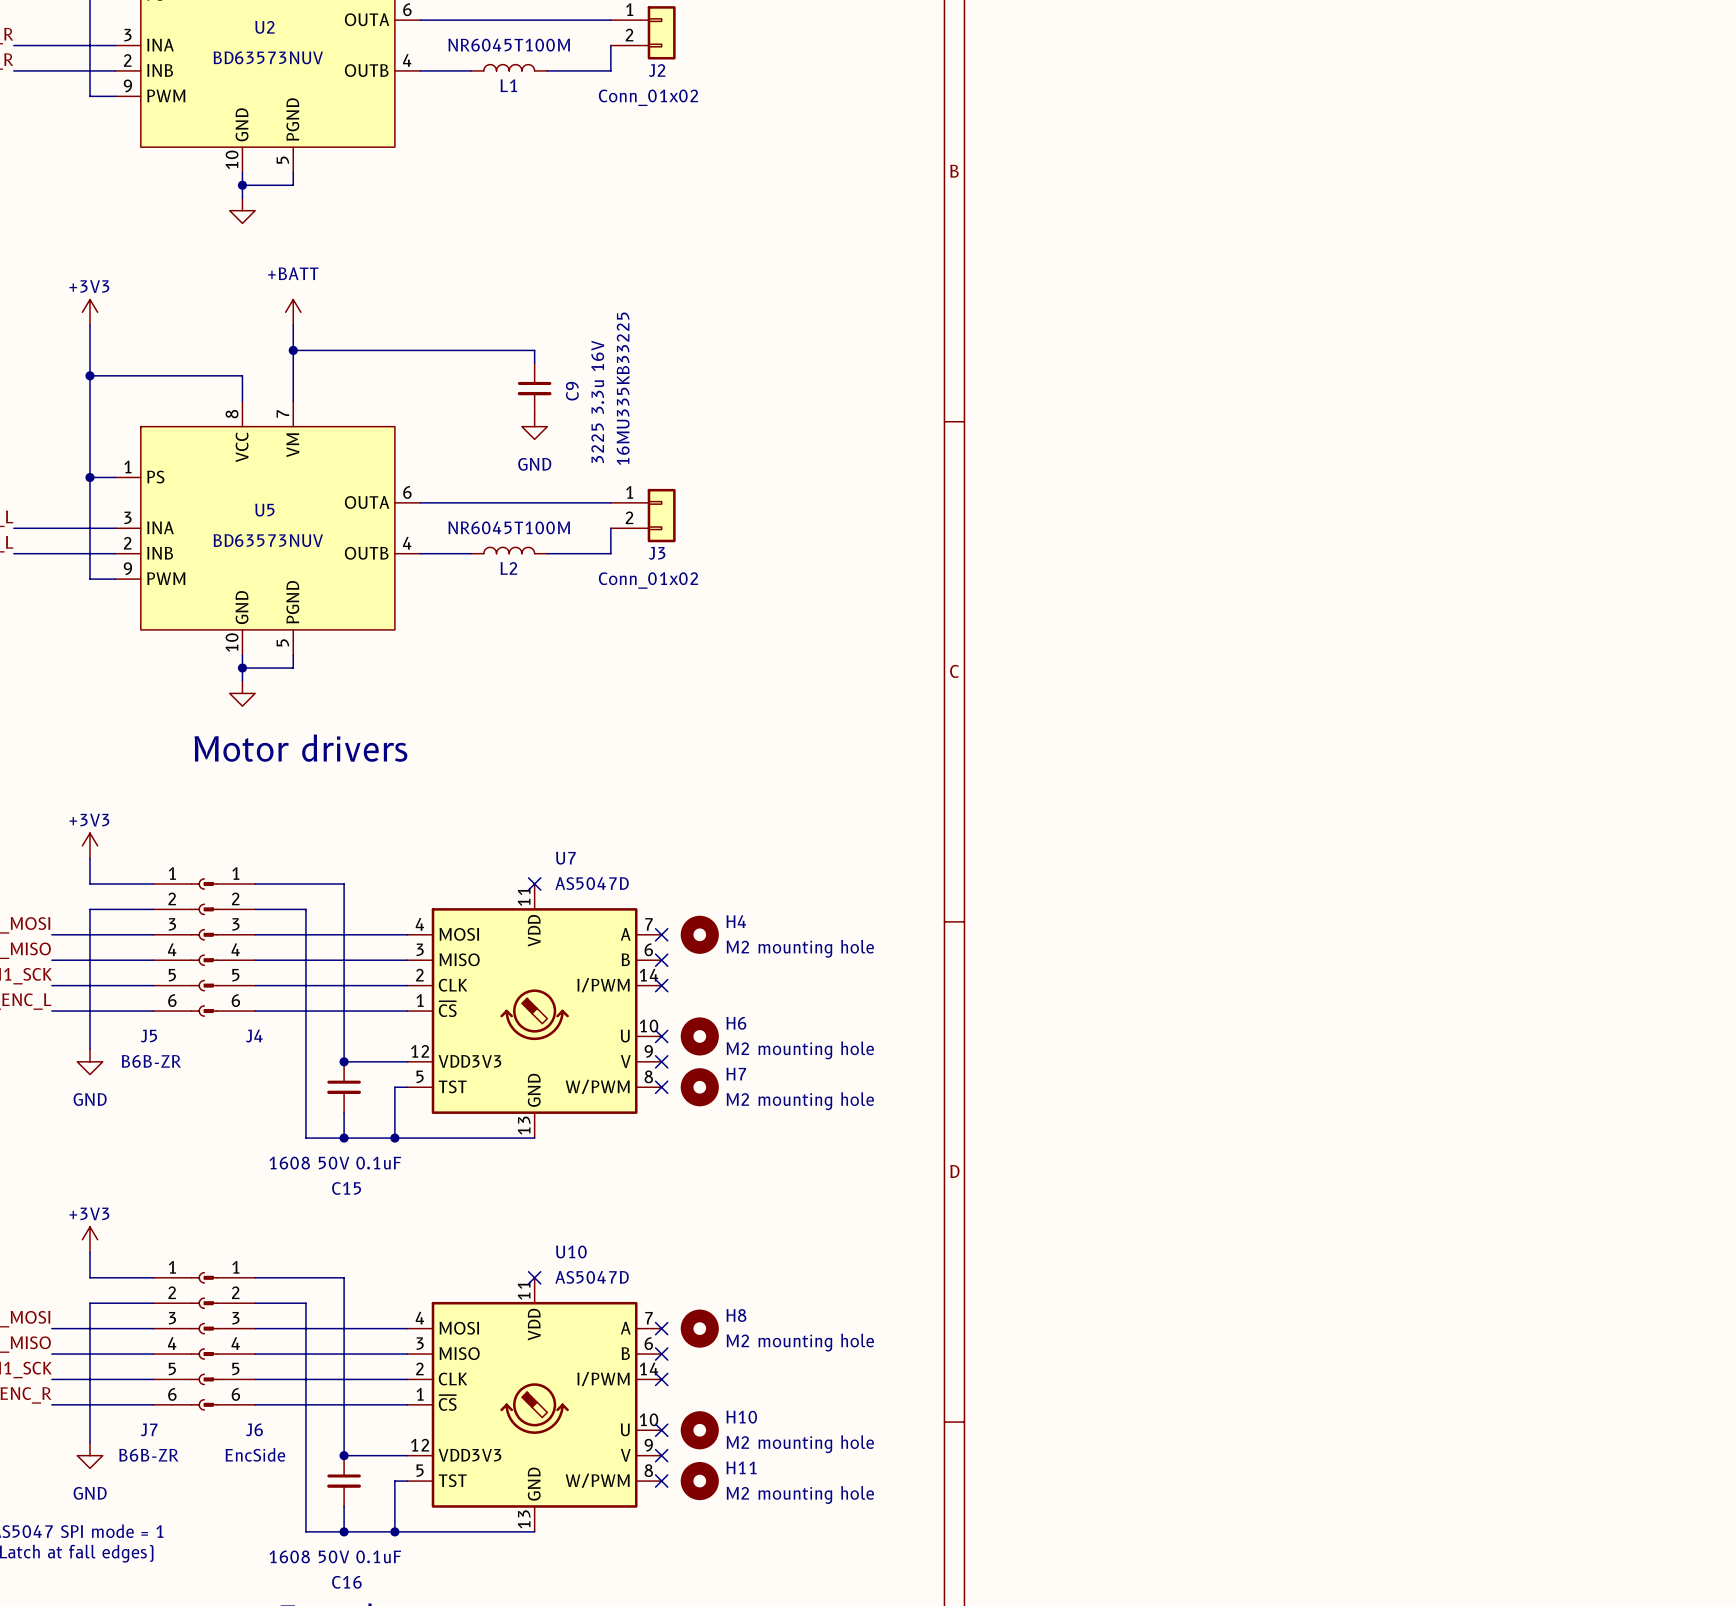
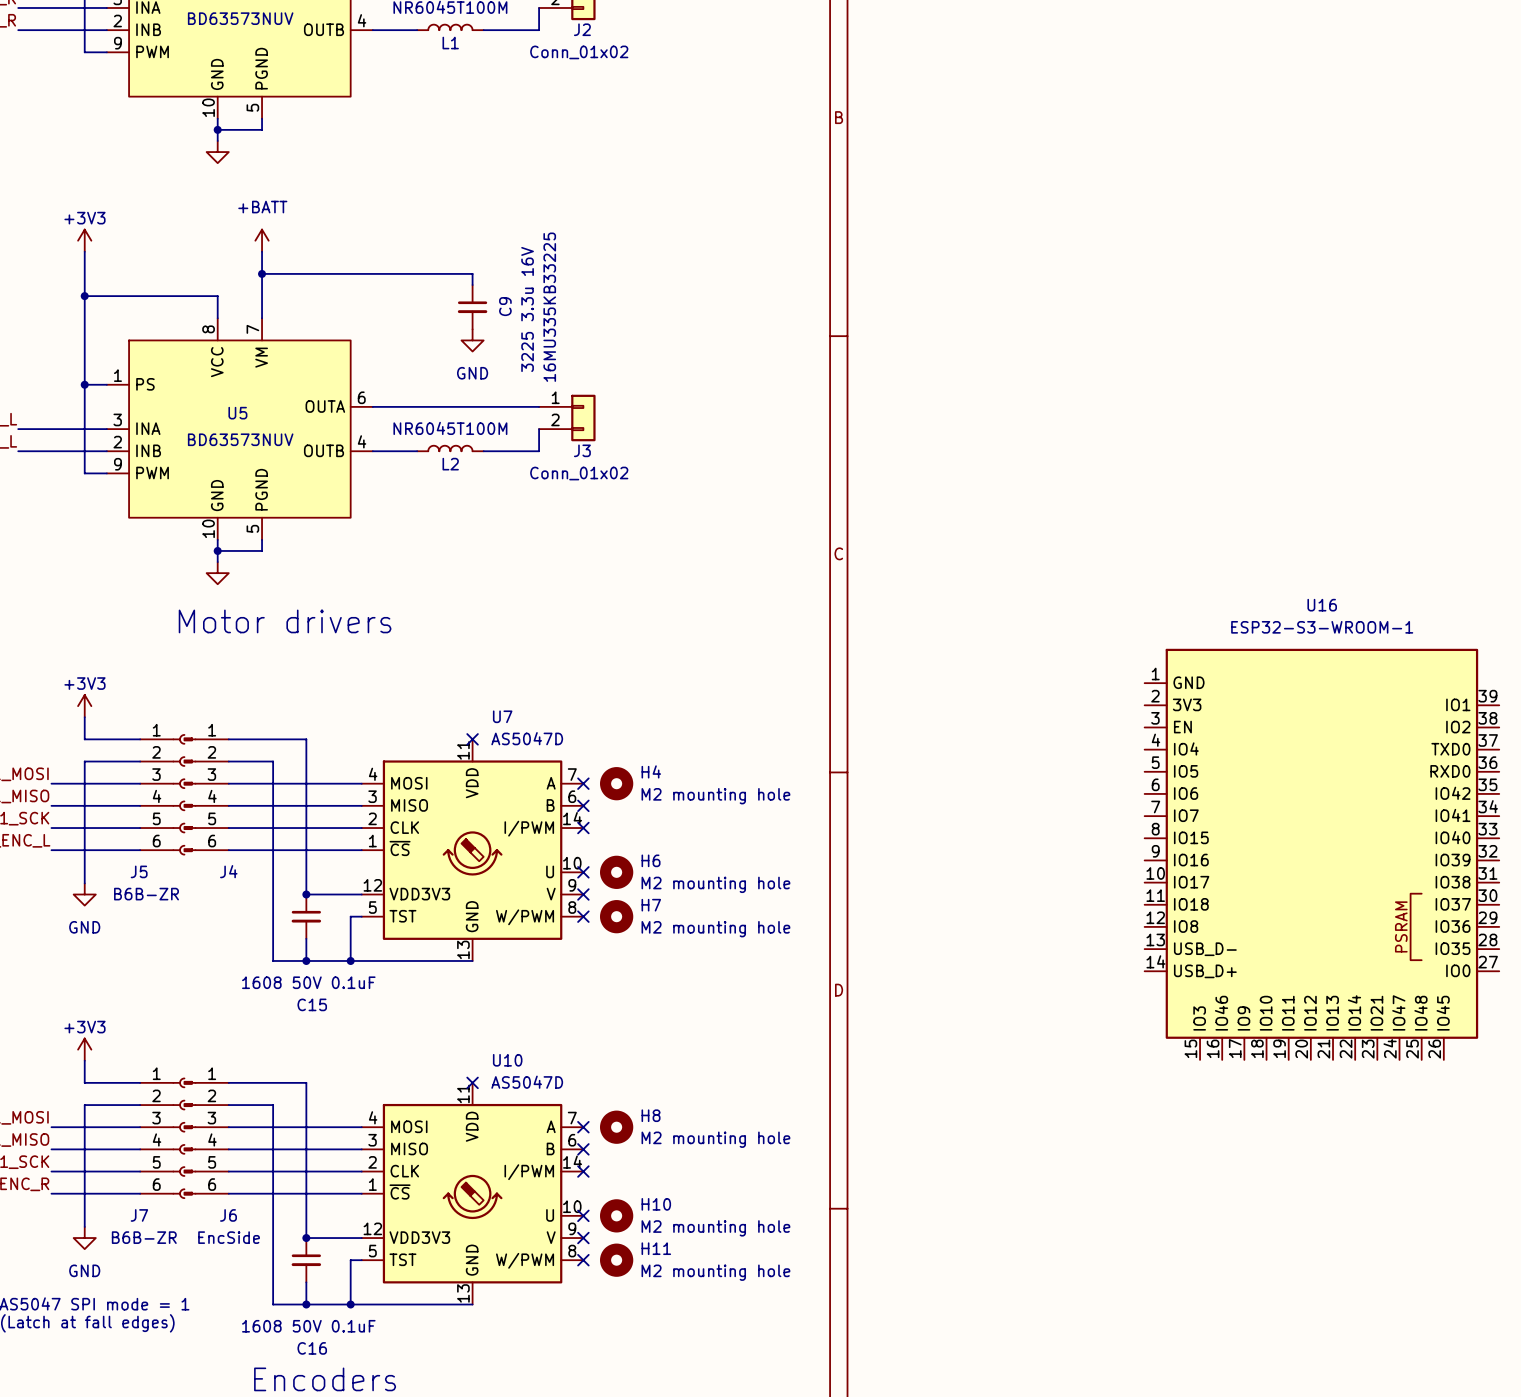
U16: none -> ESP32-S3-WROOM-1 (1321, 854)

